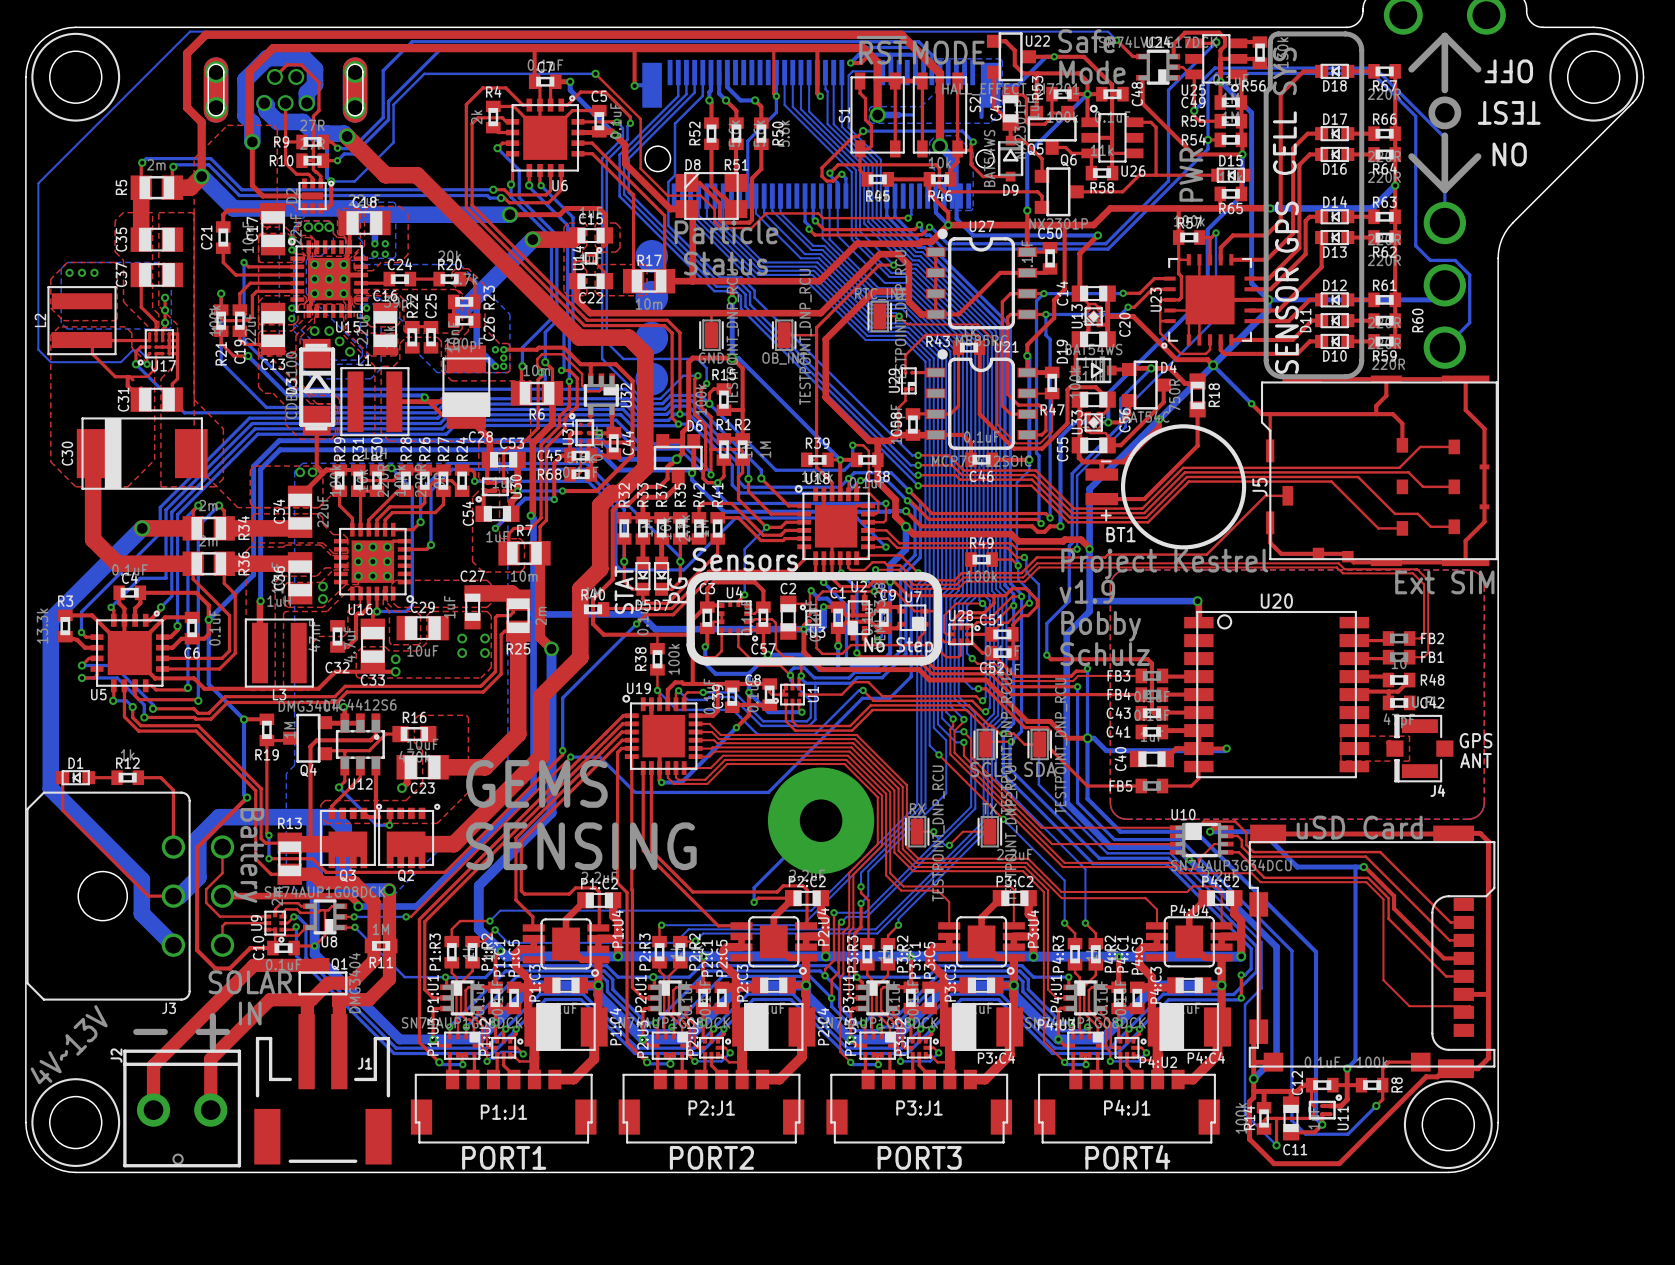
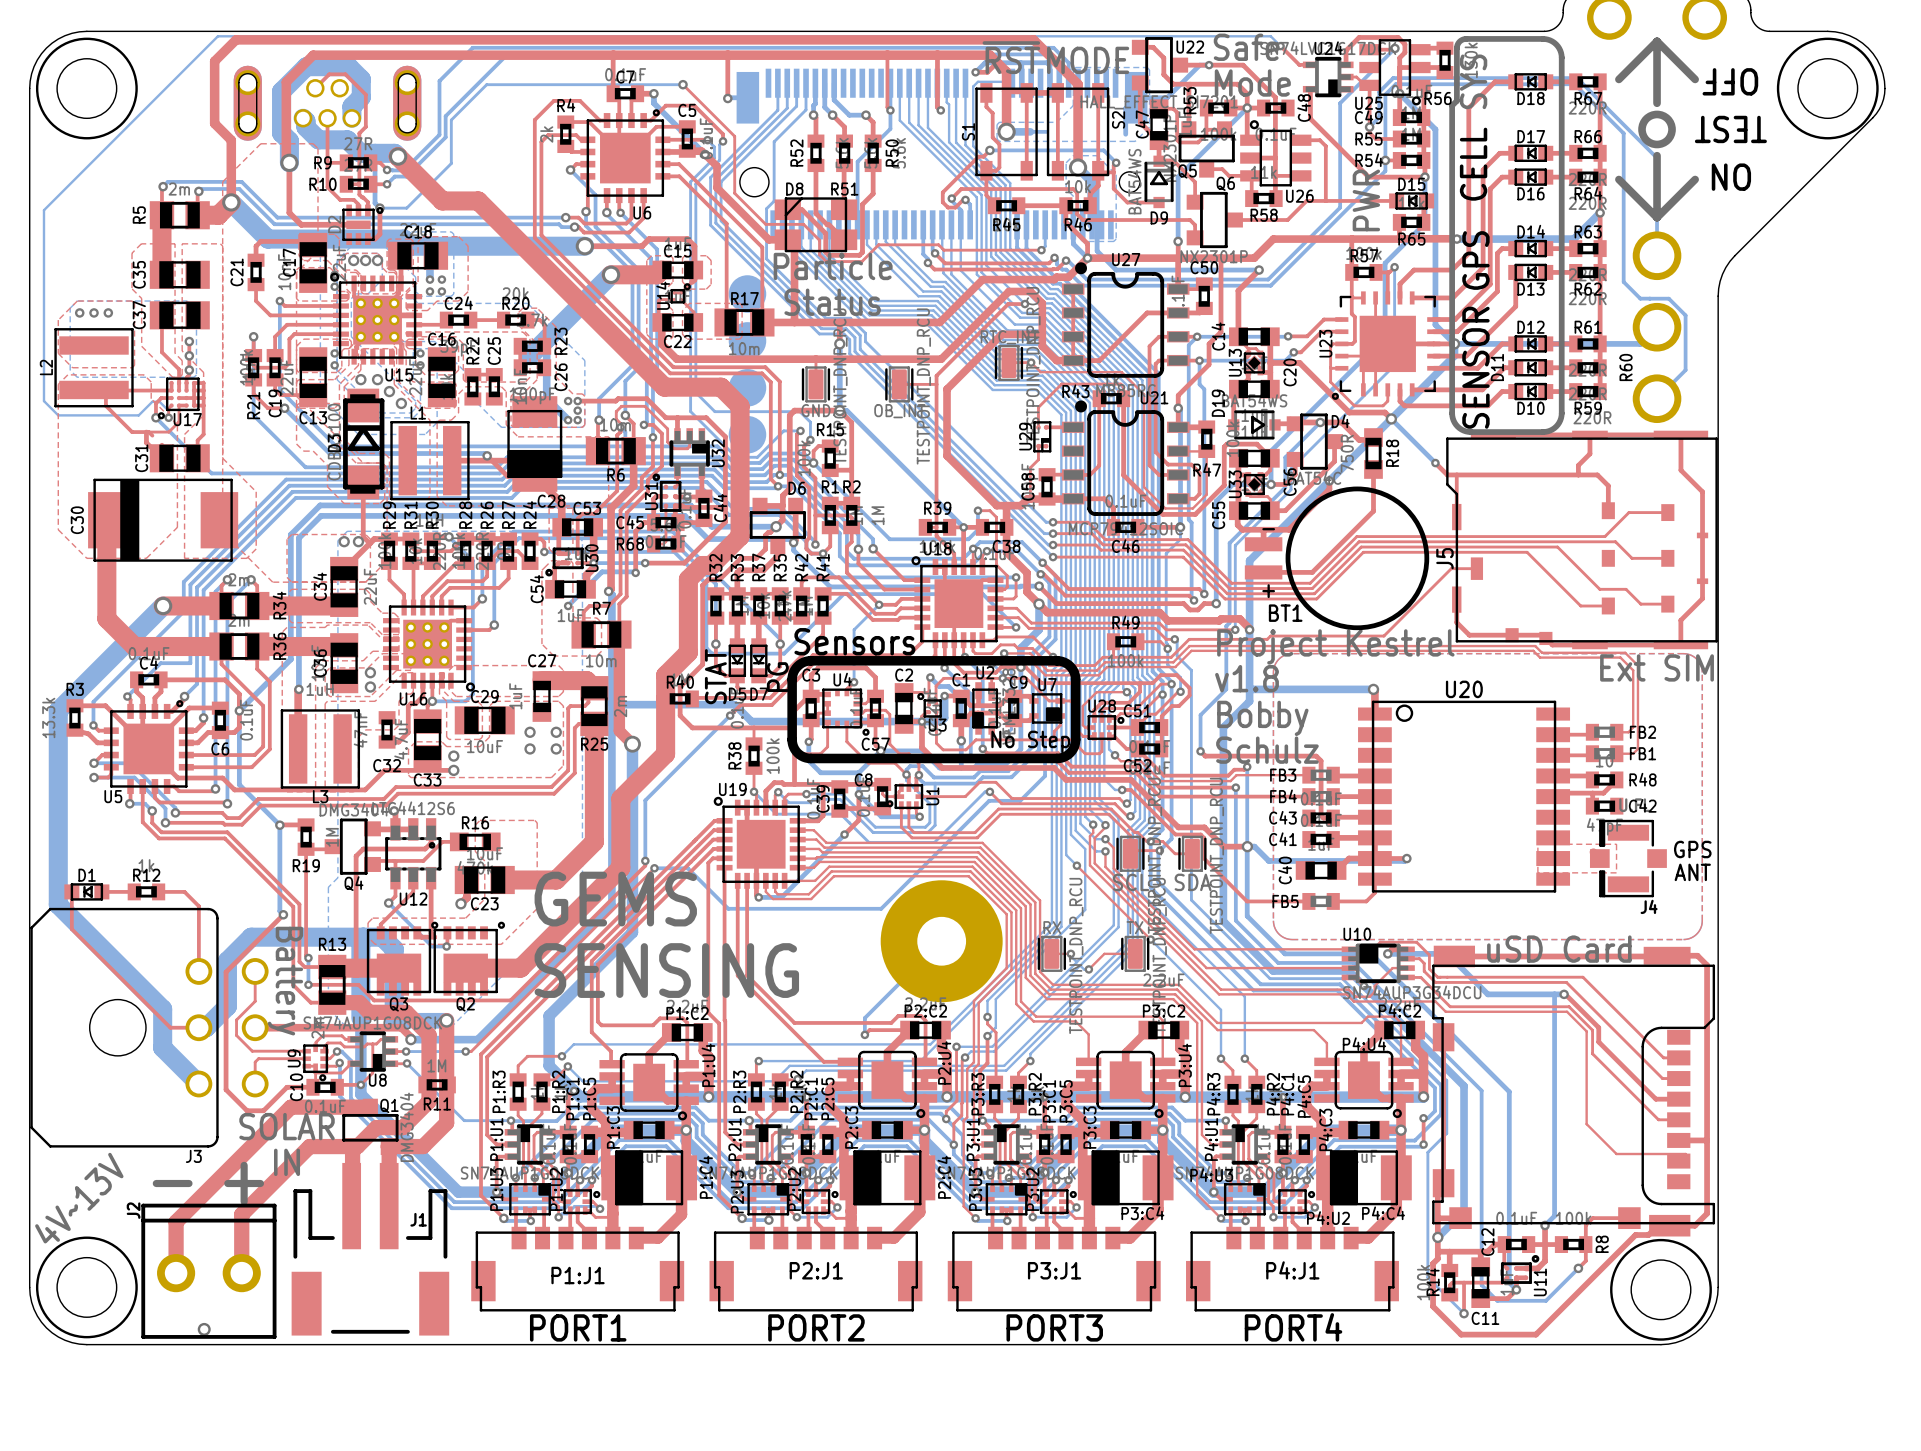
text: v1.9 (1087, 591) -> v1.8 (1247, 678)

